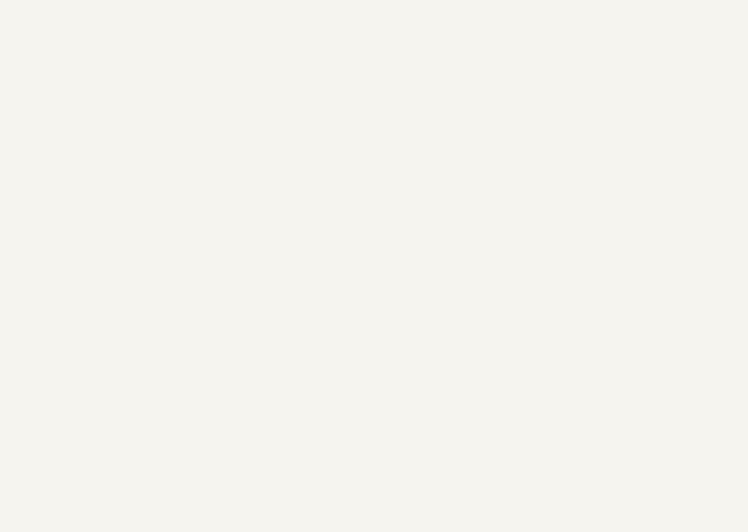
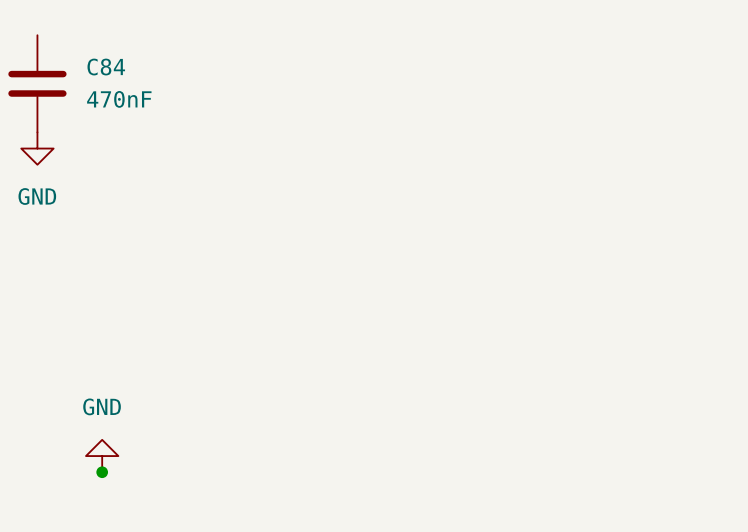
C84: none -> 470nF (37, 83)
power symbol: none -> GND (37, 148)
power symbol: none -> GND (102, 456)
junction: none -> (102, 472)

